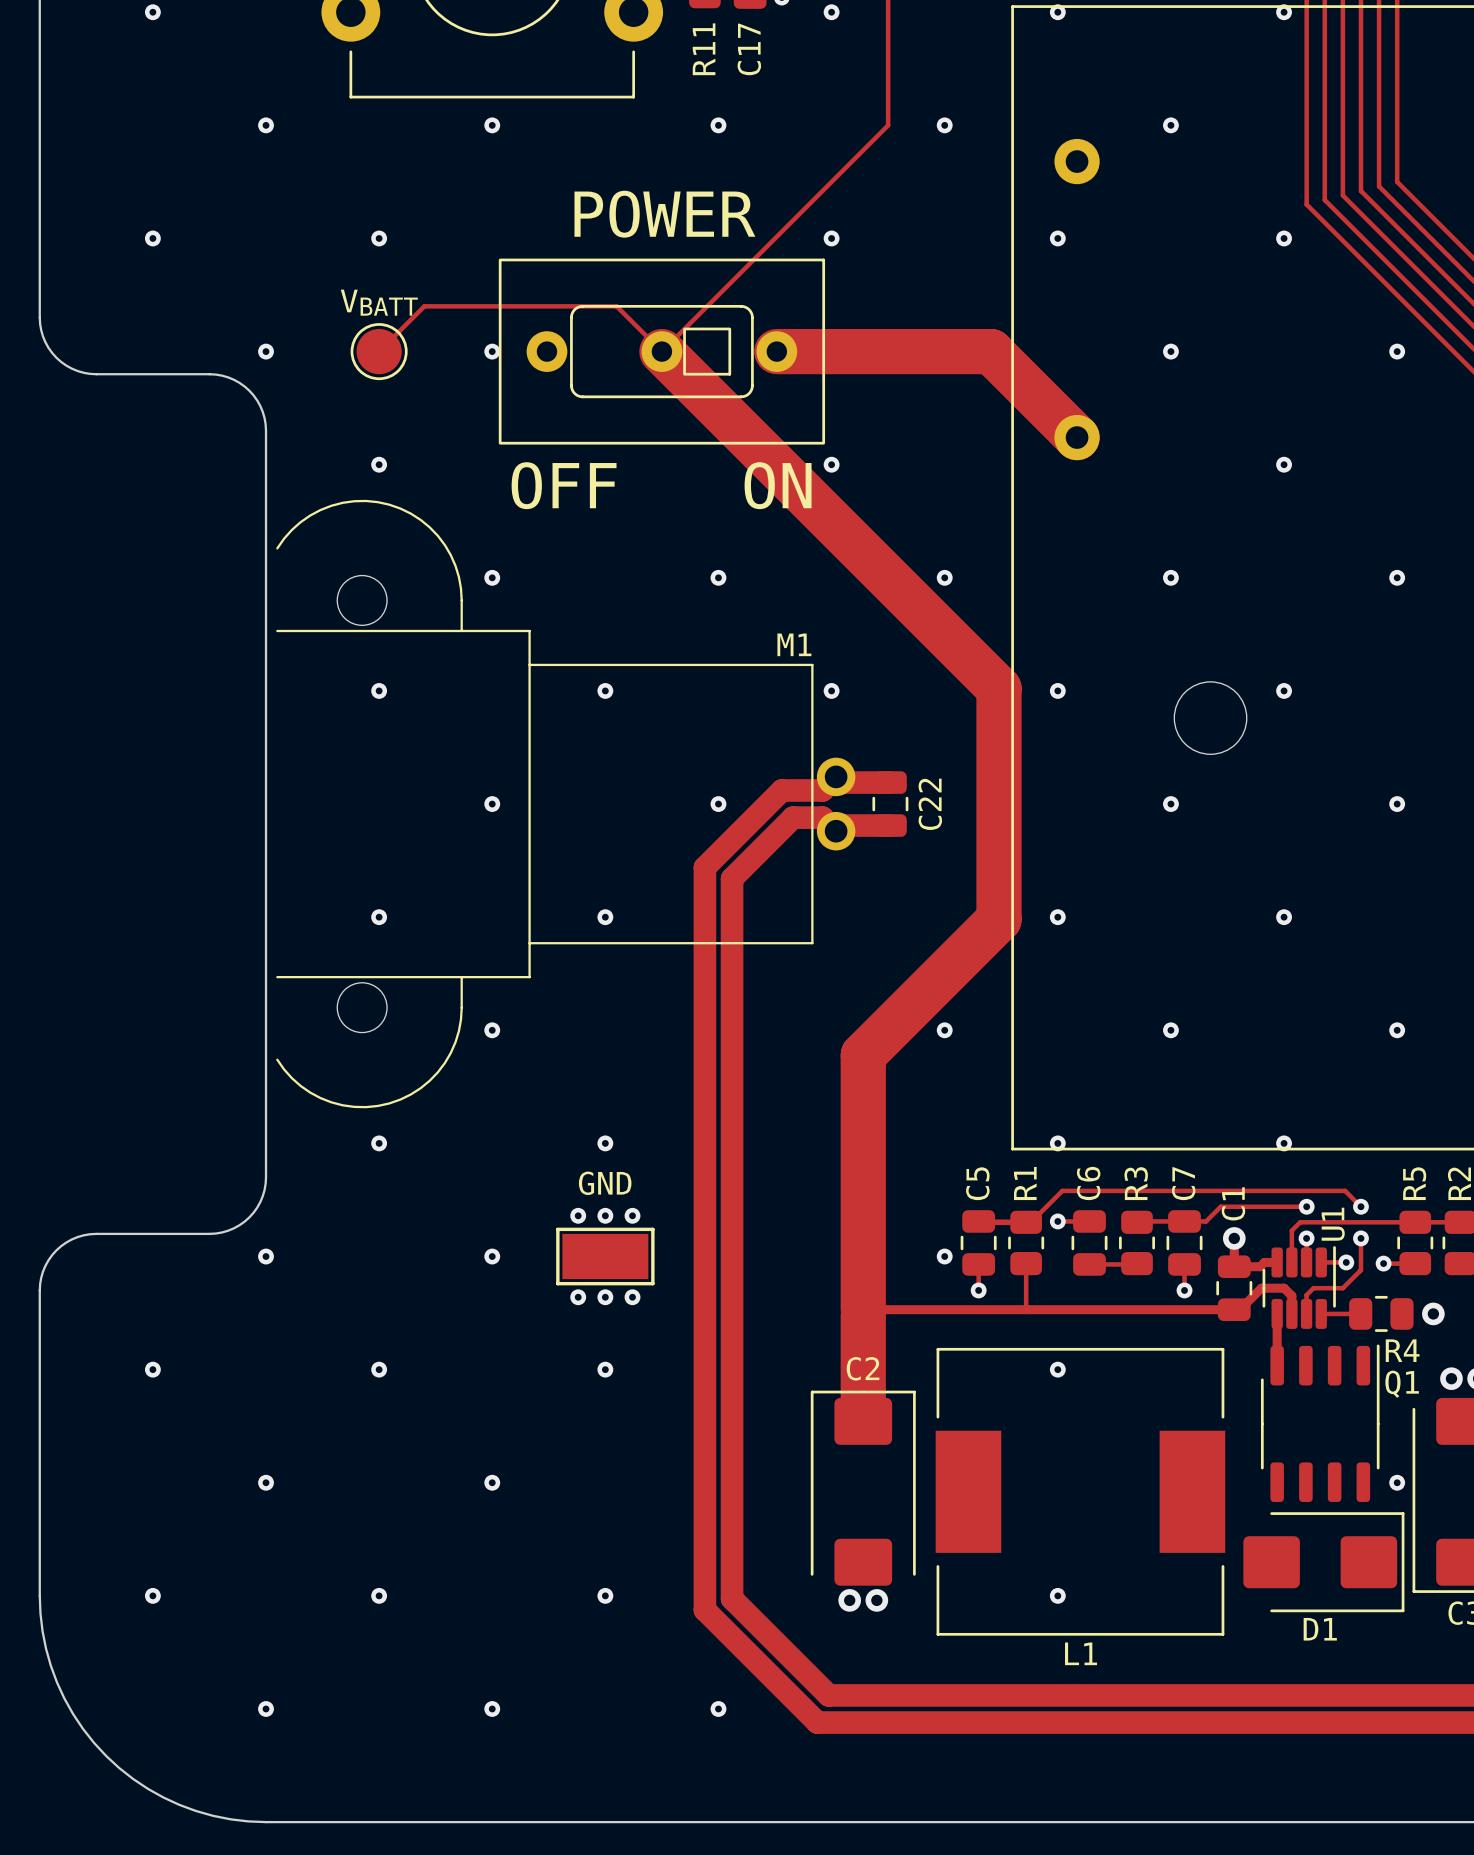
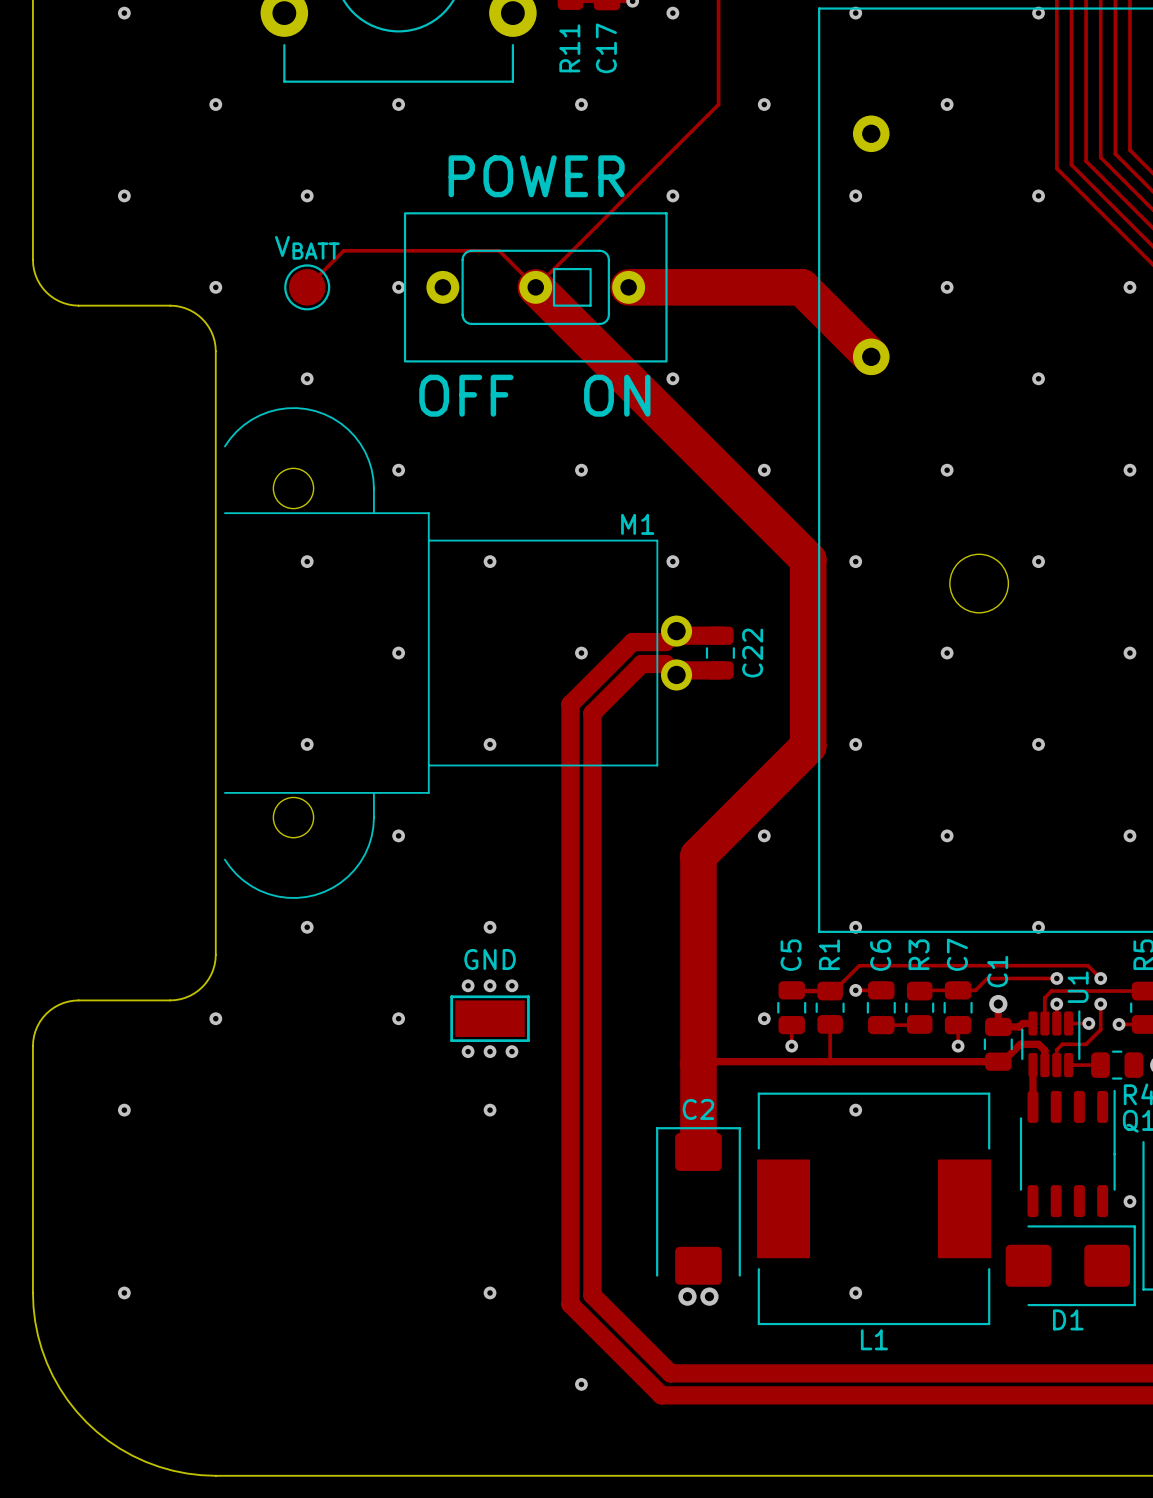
via: (379, 1369) -> none
via: (266, 1482) -> none
via: (492, 1482) -> none
via: (379, 1595) -> none
via: (266, 1708) -> none
via: (492, 1708) -> none

